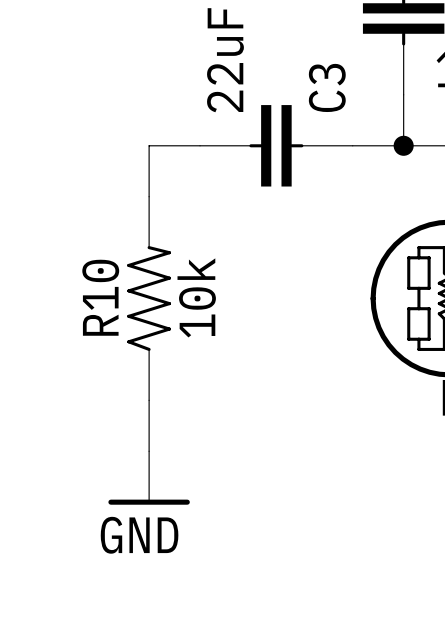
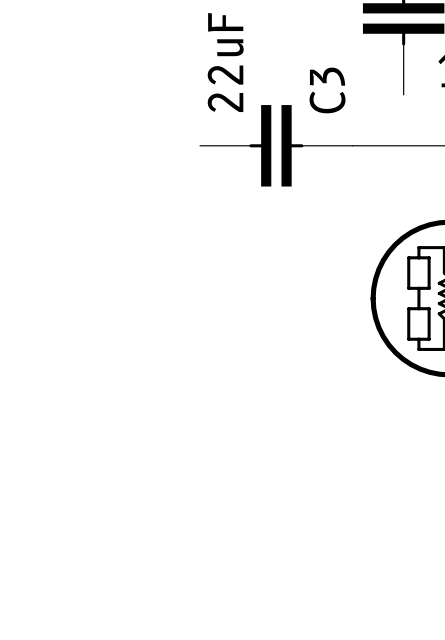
wire: (403, 94) (403, 145) -> none
wire: (200, 145) (149, 145) (149, 196) -> none
junction: (403, 145) -> none
R10: 10k (149, 298) -> none
wire: (149, 400) (149, 451) -> none
power symbol: GND (149, 477) -> none

